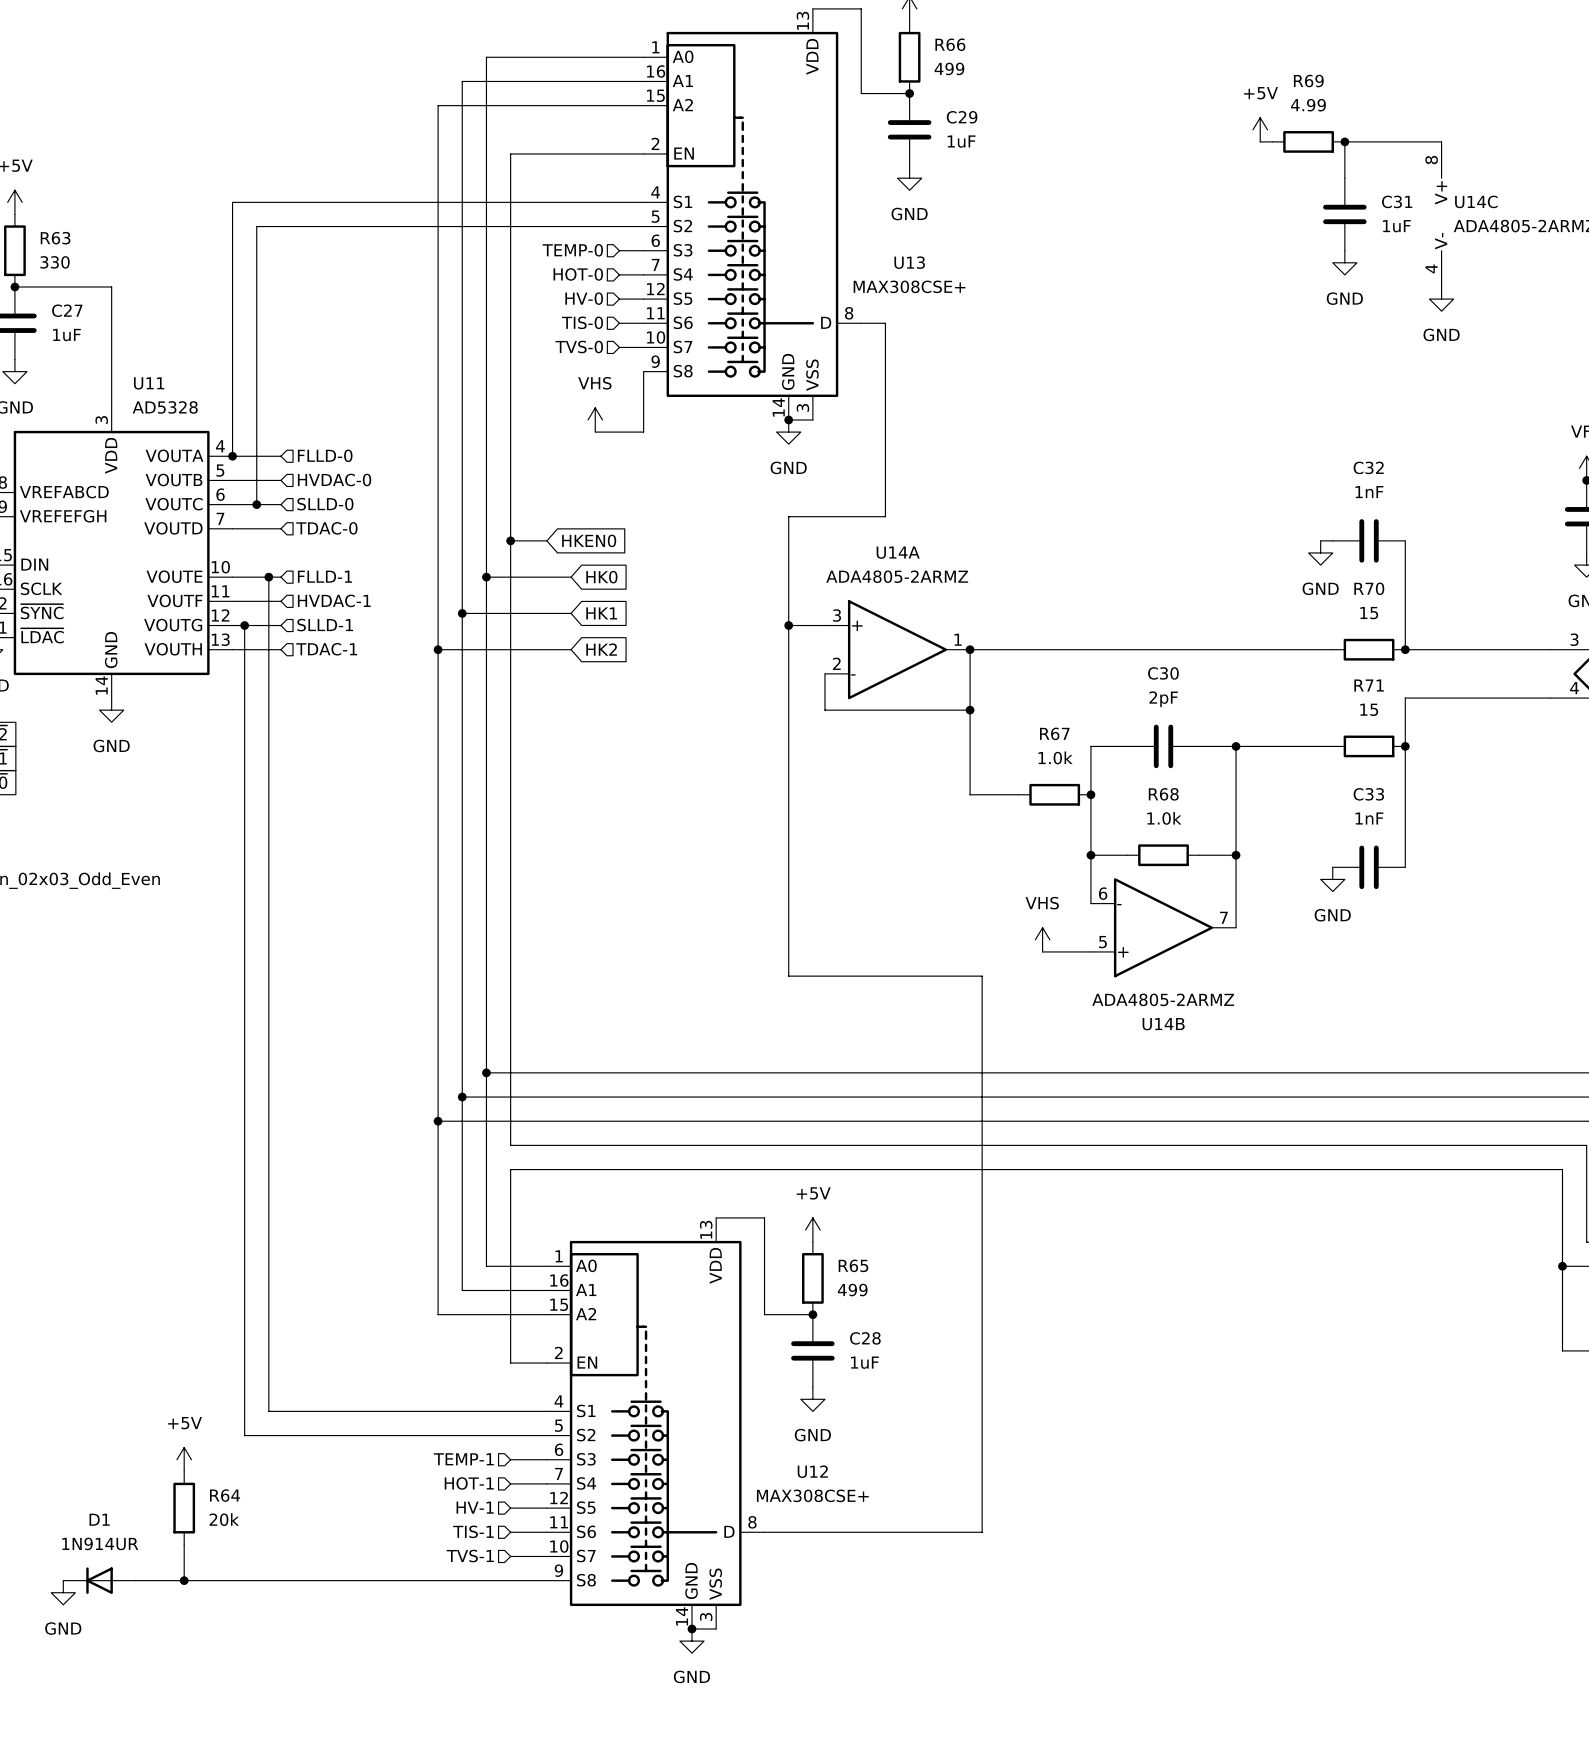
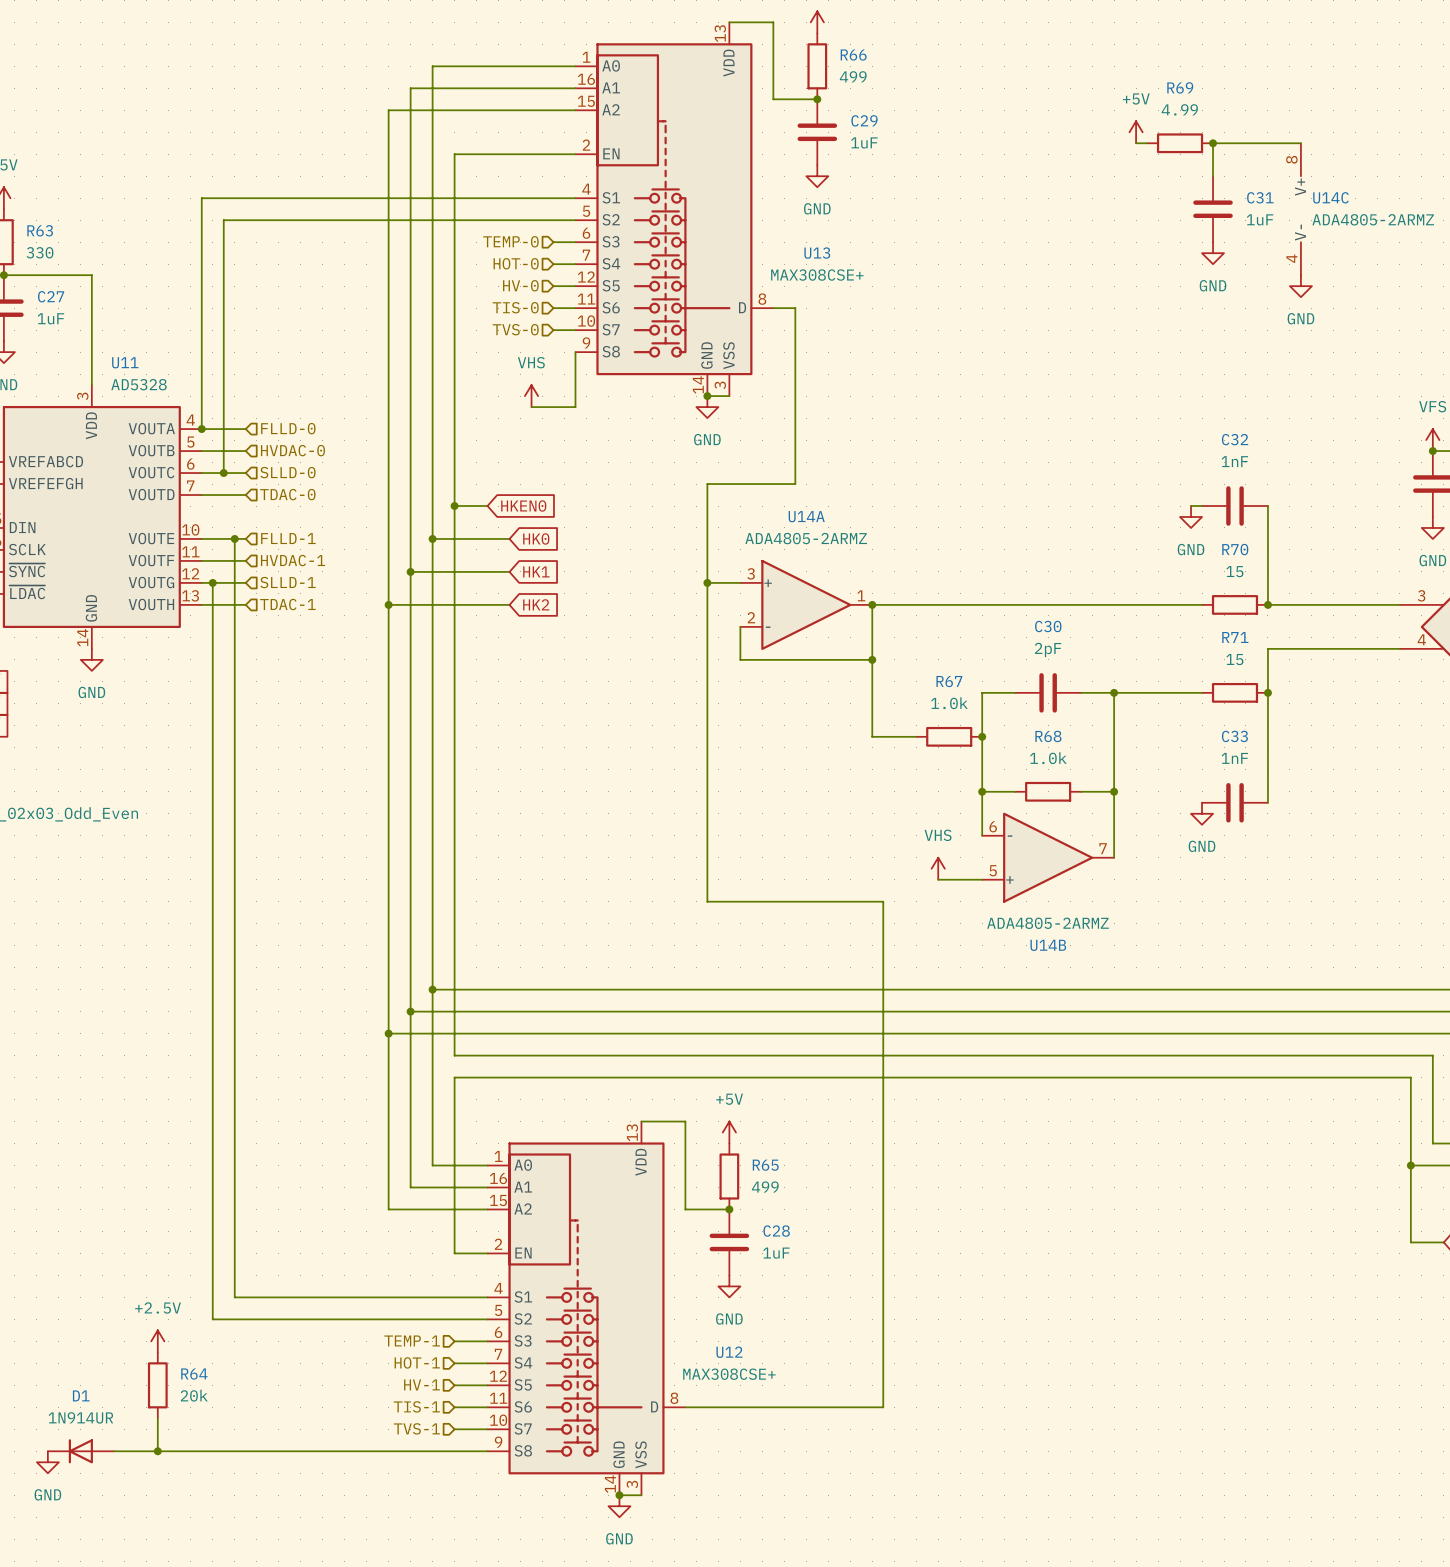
power symbol: +5V (184, 1459) -> +2.5V (157, 1341)

